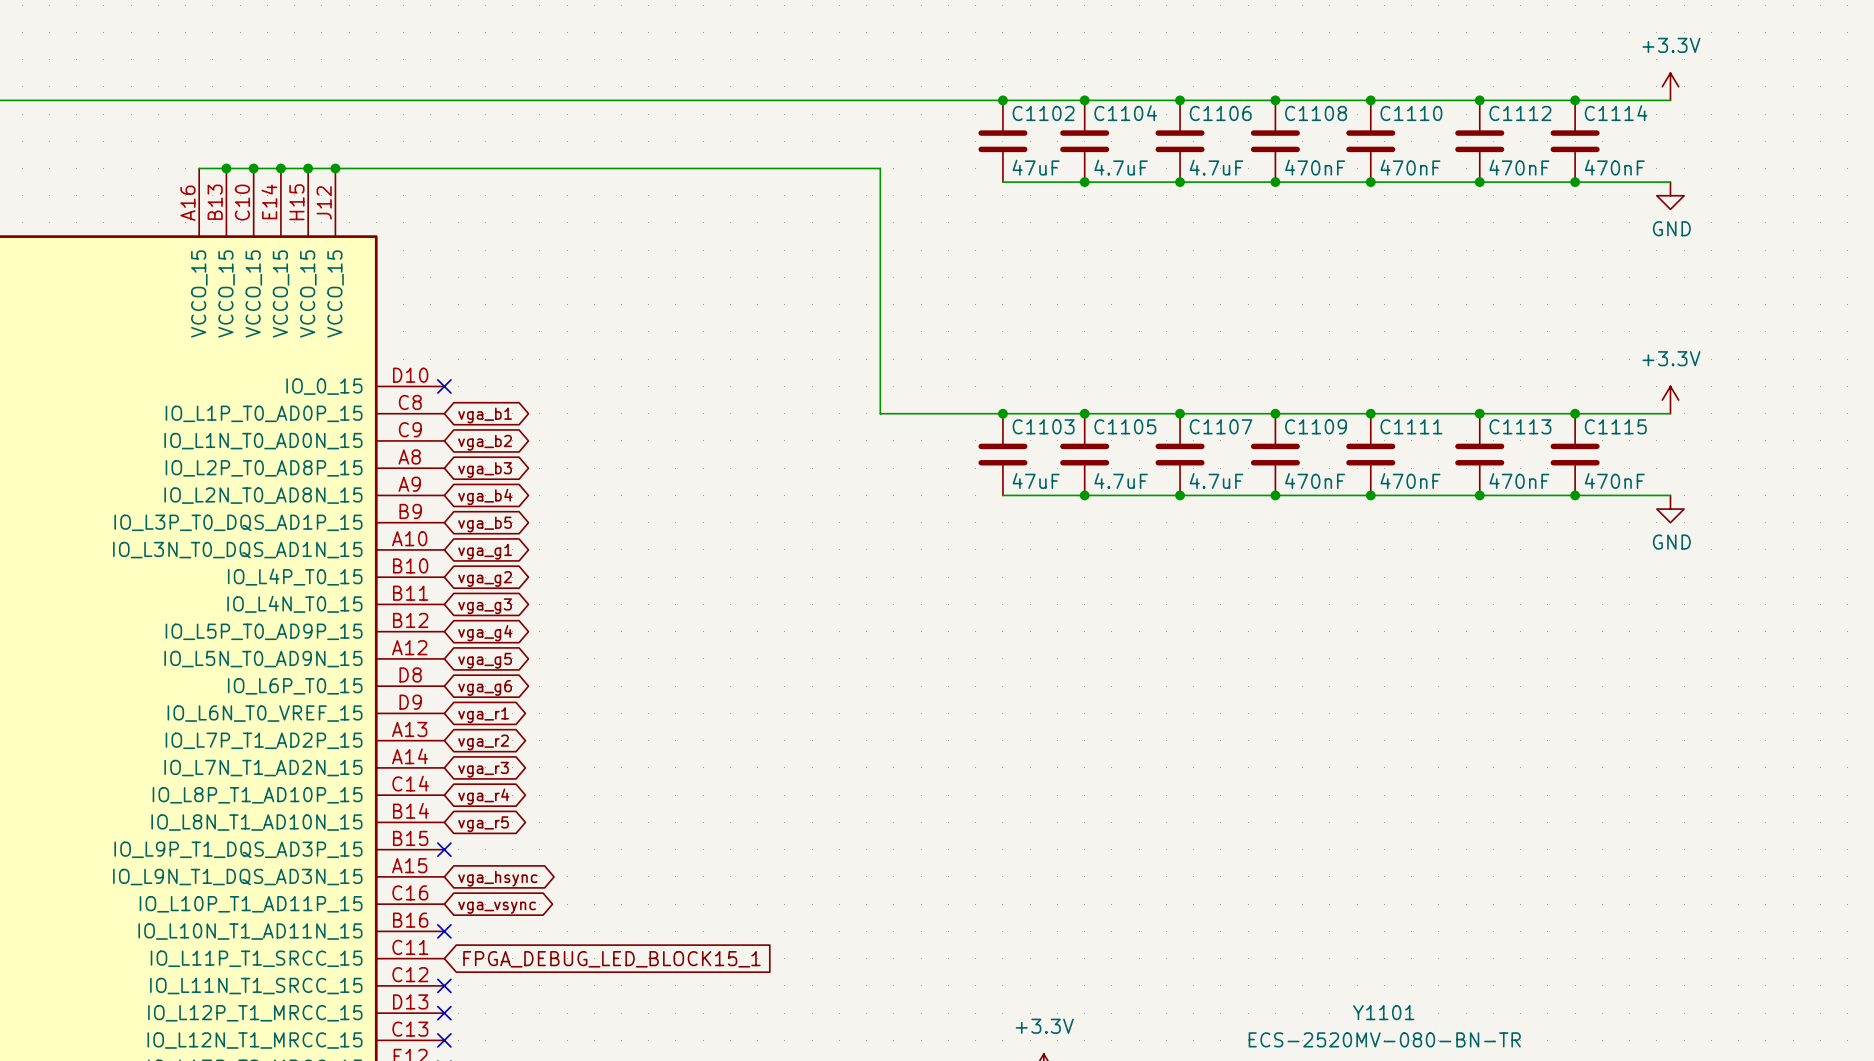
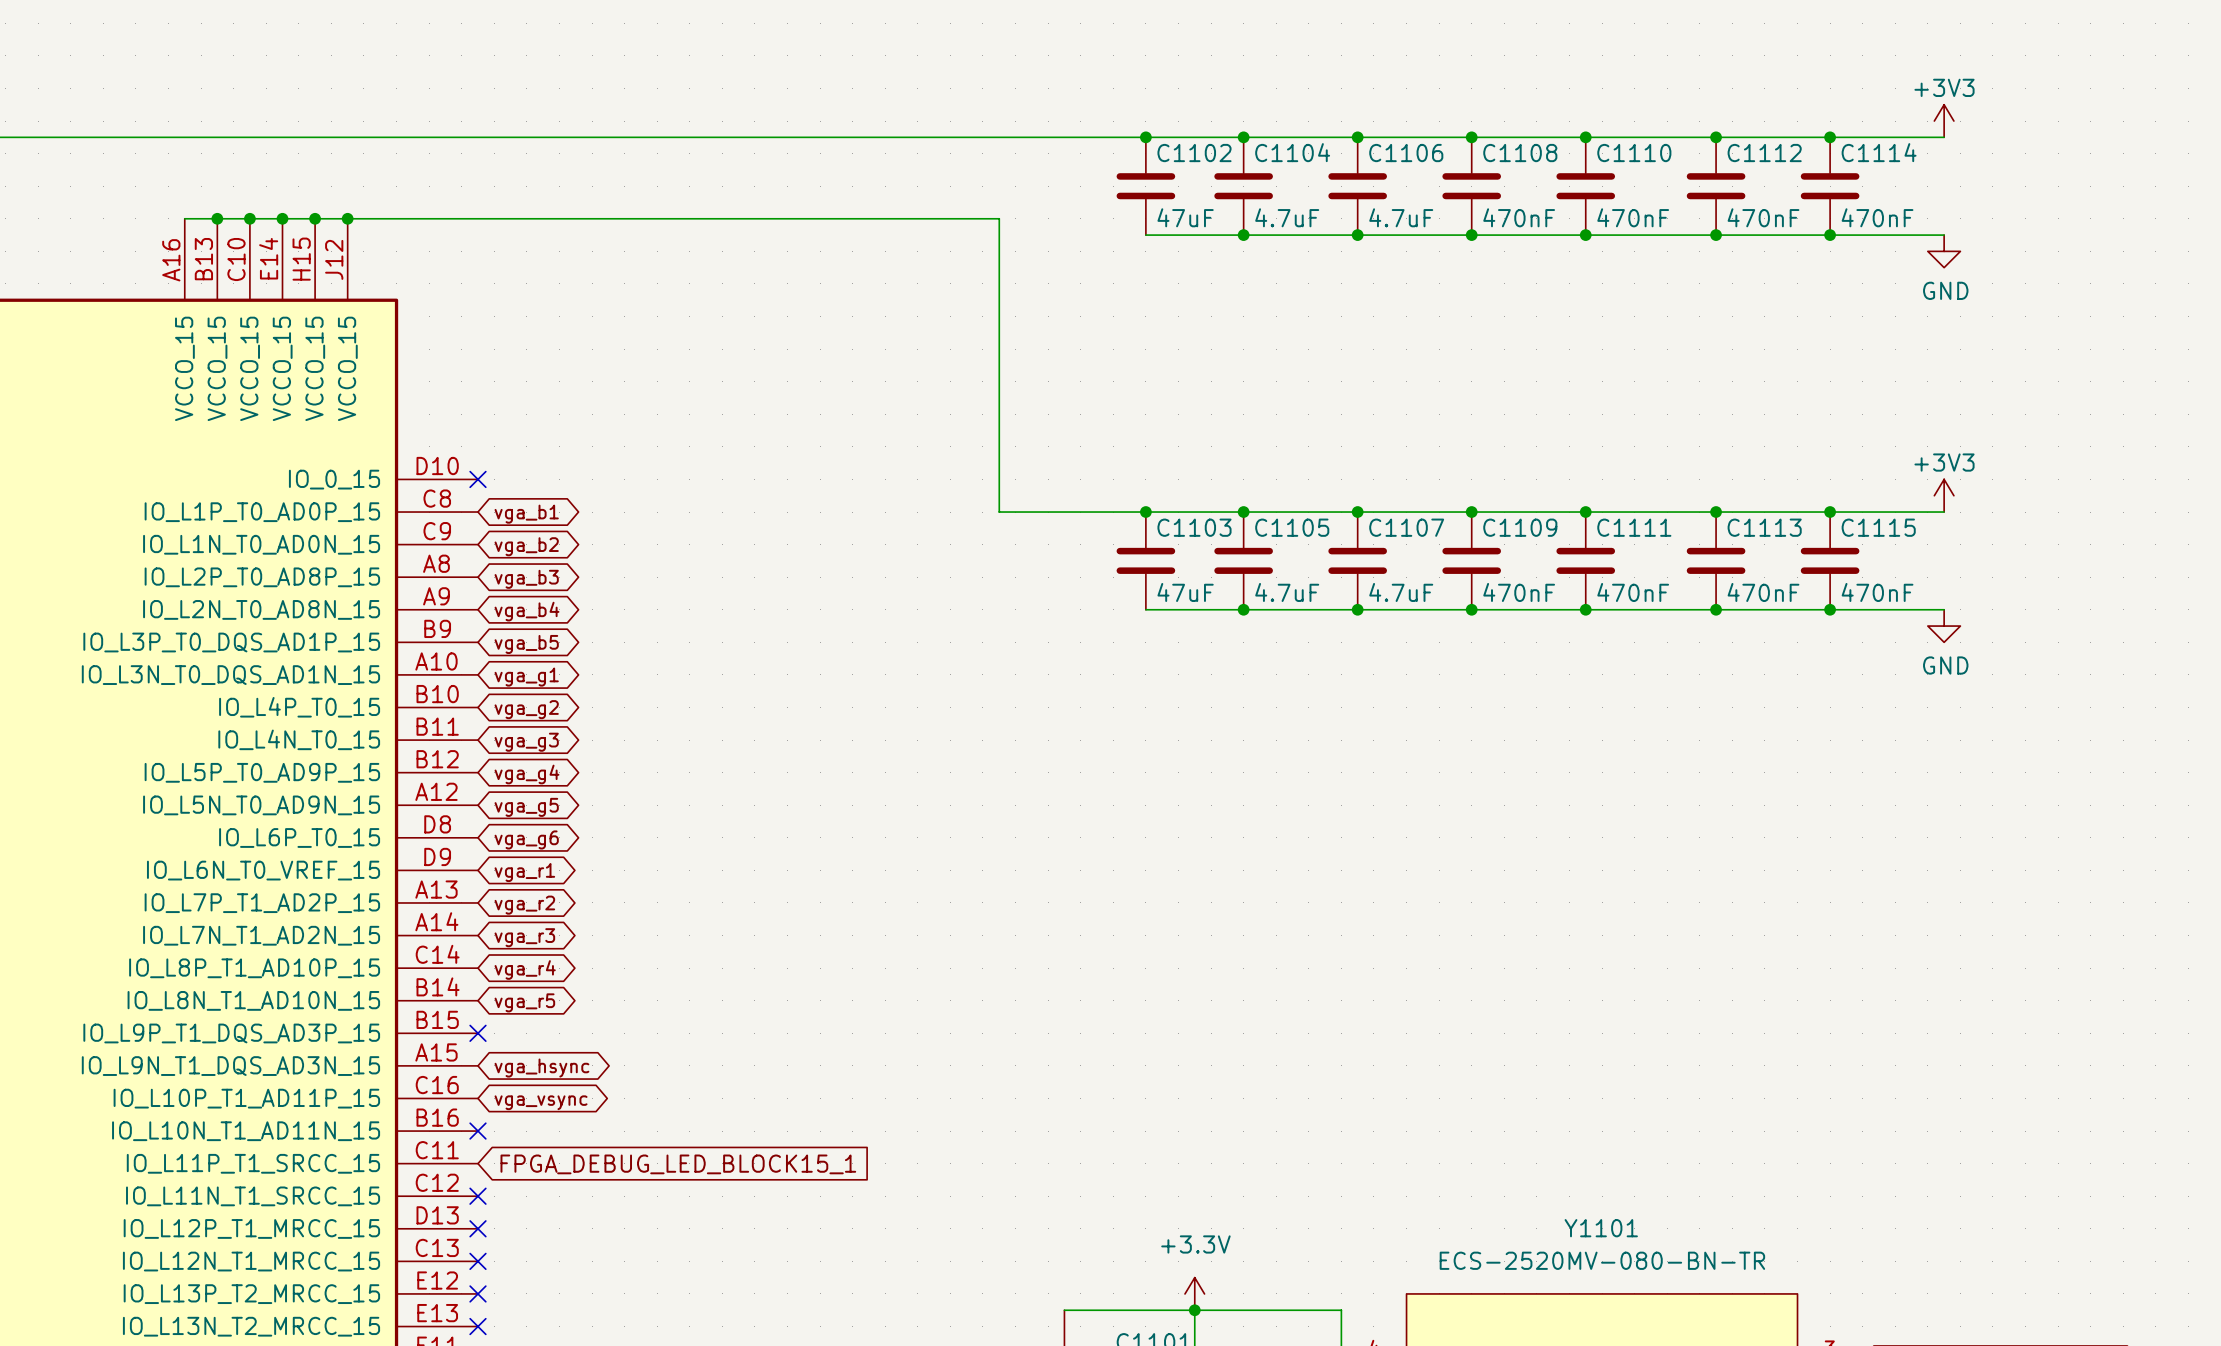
power symbol: +3.3V (1670, 86) -> +3V3 (1944, 121)
power symbol: +3.3V (1670, 400) -> +3V3 (1944, 495)

